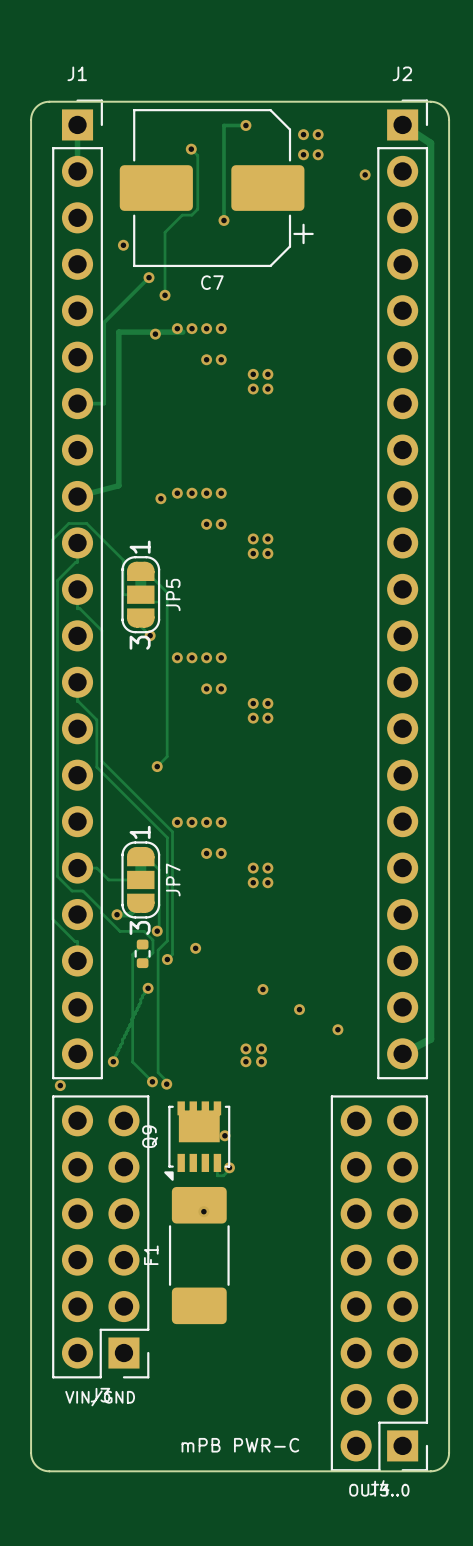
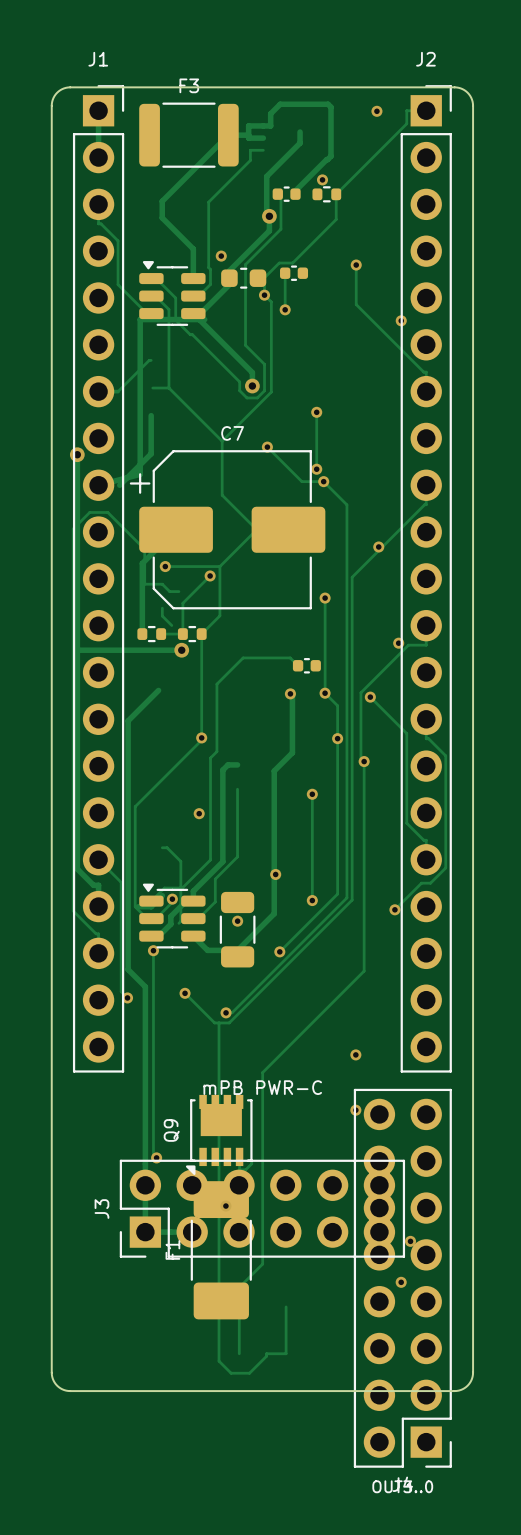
track: (402, 124) (430, 143) (430, 1039) (402, 1053) -> (426, 110) (406, 110) (406, 123) (336, 194) (336, 219) (292, 263) (279, 263) (261, 281)
track: (245, 125) (223, 125) (223, 220) -> none
via: (245, 125) -> none
via: none -> (376, 111)
via: (303, 134) -> none
via: (318, 134) -> none
track: none -> (300, 132) (300, 143) (266, 176) (266, 213) (269, 216) (269, 230) (229, 270) (229, 284) (196, 317)
F3: none -> (188, 135)
track: (191, 149) (197, 155) (197, 209) (191, 215) (182, 215) (165, 232) (165, 295) -> none
via: (191, 149) -> none
track: none -> (248, 135) (228, 135) (162, 201) (162, 217) (193, 249) (193, 278)
track: none -> (263, 138) (248, 138) (248, 125) (270, 125) (270, 113) (280, 104) (328, 104) (331, 107) (331, 156) (295, 190) (295, 194)
via: (303, 154) -> none
via: (318, 154) -> none
track: none -> (263, 150) (250, 150) (250, 160) (208, 202) (210, 284) (198, 296) (193, 296)
via: (365, 174) -> none
C7 rotation: 0° (216, 188) -> 180° (227, 529)
C7 position: (216, 188) -> (227, 529)
via: none -> (322, 179)
track: none -> (277, 194) (280, 197) (280, 229) (245, 264) (245, 345) (264, 364) (264, 390) (257, 397) (246, 397) (239, 390) (239, 381) (175, 320) (175, 298) (156, 278) (151, 278)
part: none -> (286, 194)
part: none -> (326, 194)
track: none -> (98, 204) (98, 223) (101, 223) (118, 240) (118, 284) (146, 313) (151, 313)
via: (223, 220) -> none
via: none -> (269, 216)
via: (123, 245) -> none
via: none -> (221, 256)
track: (149, 277) (104, 322) (104, 403) (96, 403) -> (151, 360) (118, 391)
via: (149, 277) -> none
track: none -> (356, 265) (356, 304) (423, 372) (426, 372) (426, 391)
via: none -> (356, 265)
track: none -> (285, 273) (285, 309)
part: none -> (294, 273)
part: none -> (243, 278)
track: none -> (261, 281) (264, 284) (264, 295) (271, 302) (271, 392) (222, 441)
via: (165, 295) -> none
part: none -> (172, 293)
via: none -> (264, 295)
track: none -> (151, 296) (155, 296) (168, 309) (168, 388)
via: none -> (285, 309)
track: none -> (193, 313) (252, 372) (252, 386)
via: (177, 328) -> none
via: (191, 328) -> none
via: (206, 328) -> none
via: (221, 328) -> none
via: none -> (401, 320)
via: (155, 334) -> none
via: (206, 359) -> none
via: (221, 359) -> none
via: (253, 374) -> none
via: (267, 374) -> none
via: (253, 388) -> none
via: (267, 388) -> none
via: none -> (252, 386)
track: none -> (152, 388) (168, 388)
track: none -> (168, 388) (222, 441)
track: none -> (316, 412) (316, 469)
via: none -> (316, 412)
track: none -> (151, 415) (151, 453) (119, 485)
track: none -> (222, 441) (222, 495) (256, 529)
track: none -> (267, 447) (301, 481) (323, 481) (346, 504) (346, 897) (232, 1012) (226, 1012)
via: none -> (267, 447)
track: none -> (77, 454) (77, 869) (93, 885) (98, 885) (98, 906)
via: none -> (77, 454)
via: none -> (316, 469)
via: none -> (323, 481)
via: (177, 493) -> none
via: (191, 493) -> none
via: (206, 493) -> none
via: (221, 493) -> none
track: none -> (426, 485) (426, 504) (352, 577) (352, 900) (229, 1022) (214, 1022) (185, 993)
via: (160, 498) -> none
via: (206, 524) -> none
via: (221, 524) -> none
via: (253, 538) -> none
via: (267, 538) -> none
track: none -> (176, 529) (142, 563) (142, 634)
track: none -> (256, 529) (219, 566)
track: (77, 542) (77, 562) (57, 580) (57, 876) (72, 891) (83, 891) (120, 931) (144, 931) (152, 940) (152, 952) (142, 963) -> none
via: (253, 553) -> none
via: (267, 553) -> none
via: none -> (378, 546)
track: (140, 570) (145, 570) (167, 592) (167, 756) (157, 766) -> none
track: none -> (165, 566) (219, 566)
via: none -> (165, 566)
track: none -> (219, 566) (219, 615) (201, 634) (201, 740) (135, 806) (135, 906) (146, 918) (156, 918) (172, 902) (172, 899)
track: none -> (210, 575) (182, 603) (182, 634) (161, 634)
via: none -> (210, 575)
track: (77, 589) (77, 608) (79, 608) (101, 630) (101, 761) (172, 831) (172, 954) (167, 959) -> none
JP5: (140, 594) -> none
track: none -> (325, 598) (325, 693) (337, 705) (337, 894) (279, 951)
via: none -> (325, 598)
via: (150, 635) -> none
track: none -> (426, 625) (426, 645) (408, 645) (360, 692) (360, 758) (364, 761) (364, 971) (262, 1072) (262, 1264) (239, 1287) (239, 1353)
part: none -> (151, 634)
part: none -> (192, 634)
via: none -> (398, 643)
via: (177, 657) -> none
via: (191, 657) -> none
via: (206, 657) -> none
via: (221, 657) -> none
track: none -> (77, 650) (181, 650)
via: none -> (181, 650)
track: none -> (298, 665) (290, 657) (243, 657) (216, 684) (216, 751) (210, 758) (210, 859) (182, 888) (164, 888) (151, 901)
part: none -> (306, 665)
track: (77, 682) (77, 701) (96, 719) (96, 767) (167, 837) (167, 940) (158, 950) (158, 1072) (166, 1081) (166, 1084) -> none
via: (206, 688) -> none
via: (221, 688) -> none
track: none -> (158, 690) (128, 720) (128, 969) (145, 986) (145, 1232) (192, 1232)
track: none -> (292, 691) (292, 752) (274, 771) (274, 913) (237, 950)
via: none -> (325, 693)
via: (253, 703) -> none
track: none -> (370, 697) (406, 733) (406, 823) (423, 840) (426, 840) (426, 859)
via: none -> (370, 697)
via: (253, 718) -> none
via: (267, 718) -> none
track: none -> (426, 719) (426, 738) (428, 738) (445, 755) (445, 867) (430, 883) (421, 883) (394, 909)
via: none -> (337, 738)
via position: (157, 766) -> (201, 737)
via: none -> (364, 761)
track: none -> (237, 764) (228, 764) (222, 770) (222, 861) (193, 891) (193, 901) (186, 901) (170, 916) (170, 924) (158, 936) (151, 936)
track: none -> (237, 789) (237, 856) (215, 879) (215, 901) (198, 918) (193, 918)
track: none -> (312, 794) (312, 900)
via: none -> (312, 794)
via: (191, 822) -> none
via: (206, 822) -> none
via: (221, 822) -> none
via: (206, 853) -> none
via: (221, 853) -> none
track: (77, 868) (96, 868) (108, 879) (140, 879) -> (98, 859) (121, 882) (121, 991) (127, 997)
via: (253, 868) -> none
via: (267, 868) -> none
JP7: (140, 879) -> none
via: (267, 882) -> none
via: none -> (172, 899)
via: none -> (312, 900)
via: (117, 914) -> none
via: none -> (394, 909)
part: none -> (172, 916)
via: (157, 931) -> none
part: none -> (237, 929)
track: none -> (193, 936) (207, 950) (237, 950)
track: (142, 944) (132, 954) (132, 1062) (152, 1081) -> none
via position: (195, 948) -> (237, 921)
part: (142, 953) -> none
track: none -> (153, 950) (153, 1154) (156, 1157)
via: none -> (153, 950)
via: (167, 959) -> none
track: (148, 988) (140, 999) (113, 1061) -> none
via: (148, 988) -> none
via position: (262, 989) -> (279, 951)
via: none -> (185, 993)
via: none -> (127, 997)
via: (299, 1009) -> none
via: none -> (226, 1012)
via: (337, 1029) -> none
track: none -> (219, 1022) (219, 1361) (231, 1373) (249, 1373) (266, 1356) (266, 1353) (286, 1353) (286, 1306)
via: (245, 1048) -> none
via: (261, 1048) -> none
via: (113, 1061) -> none
via: (245, 1061) -> none
via: (261, 1061) -> none
via: none -> (355, 1054)
via: (152, 1081) -> none
via: (166, 1084) -> none
via: (60, 1085) -> none
via: none -> (355, 1110)
via: (224, 1135) -> none
via: none -> (156, 1157)
via: (229, 1167) -> none
J3 rotation: 0° (100, 1236) -> 90° clockwise (262, 1208)
via: none -> (410, 1241)
via: none -> (401, 1282)
board edge: (31, 1376) (31, 1457) (37, 1467) (49, 1471) (434, 1470) (443, 1465) (448, 1455) (449, 1376) -> (51, 1372) (57, 1385) (70, 1391) (454, 1391) (467, 1385) (473, 1372)
text: VIN/GND (100, 1398) -> none
text position: mPB PWR-C (240, 1445) -> mPB PWR-C (262, 1087)

